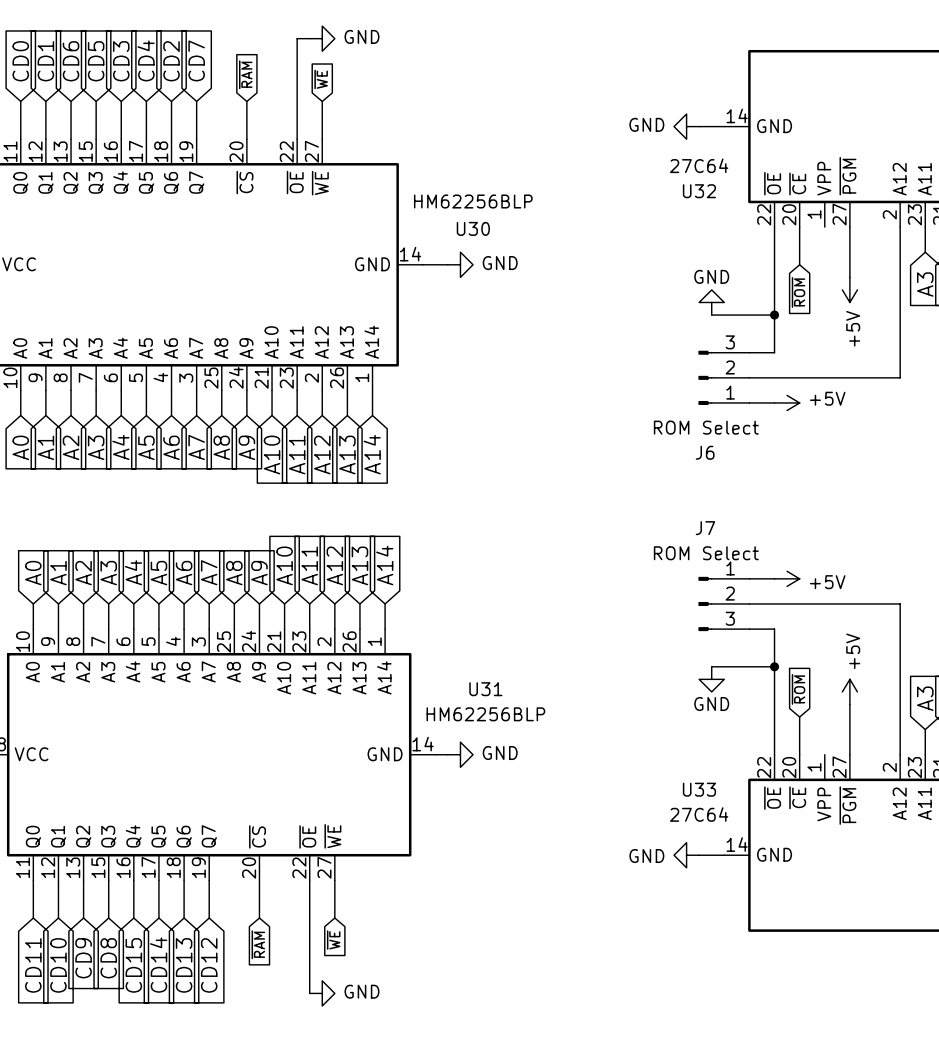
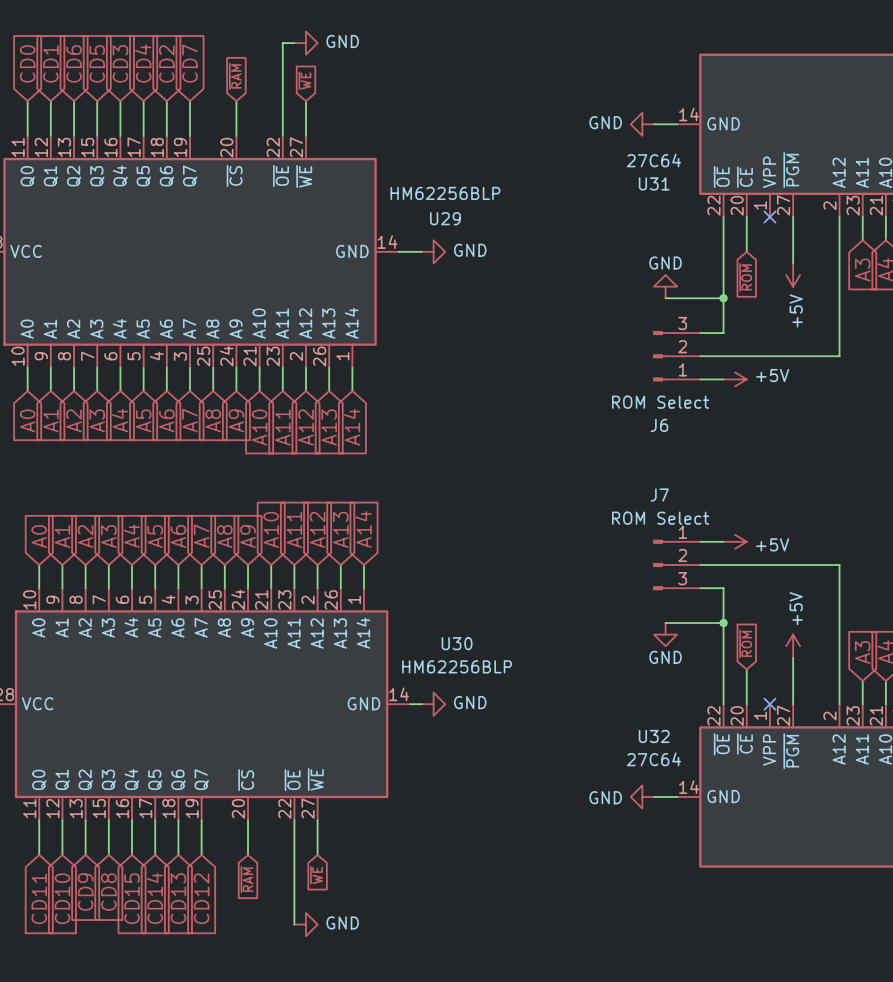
U32 name: U32 (699, 191) -> U31 (654, 183)
no-connect mark: none -> (769, 217)
U30 name: U30 (473, 228) -> U29 (445, 218)
U31 name: U31 (485, 689) -> U30 (457, 643)
no-connect mark: none -> (769, 704)
U33 name: U33 (699, 789) -> U32 (654, 736)

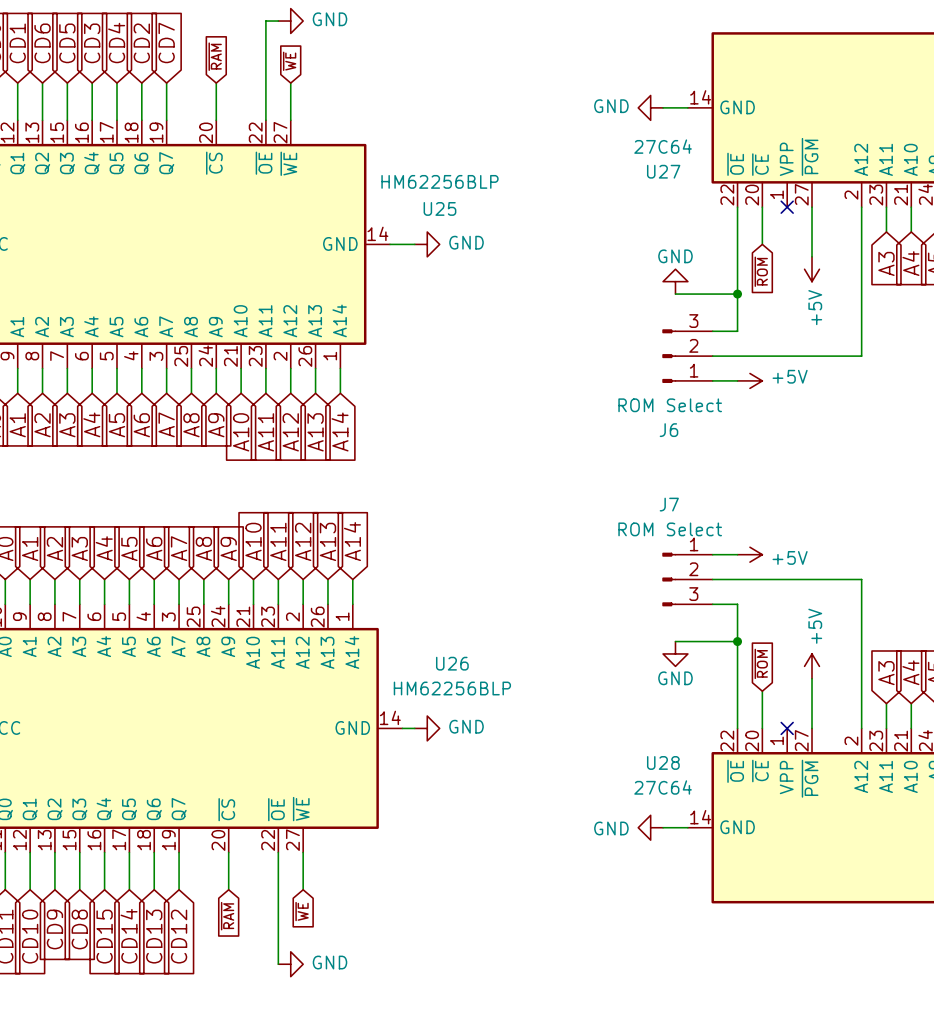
U31 name: U31 (654, 183) -> U27 (663, 171)
U29 name: U29 (445, 218) -> U25 (439, 208)
U30 name: U30 (457, 643) -> U26 (452, 663)
U32 name: U32 (654, 736) -> U28 (663, 762)

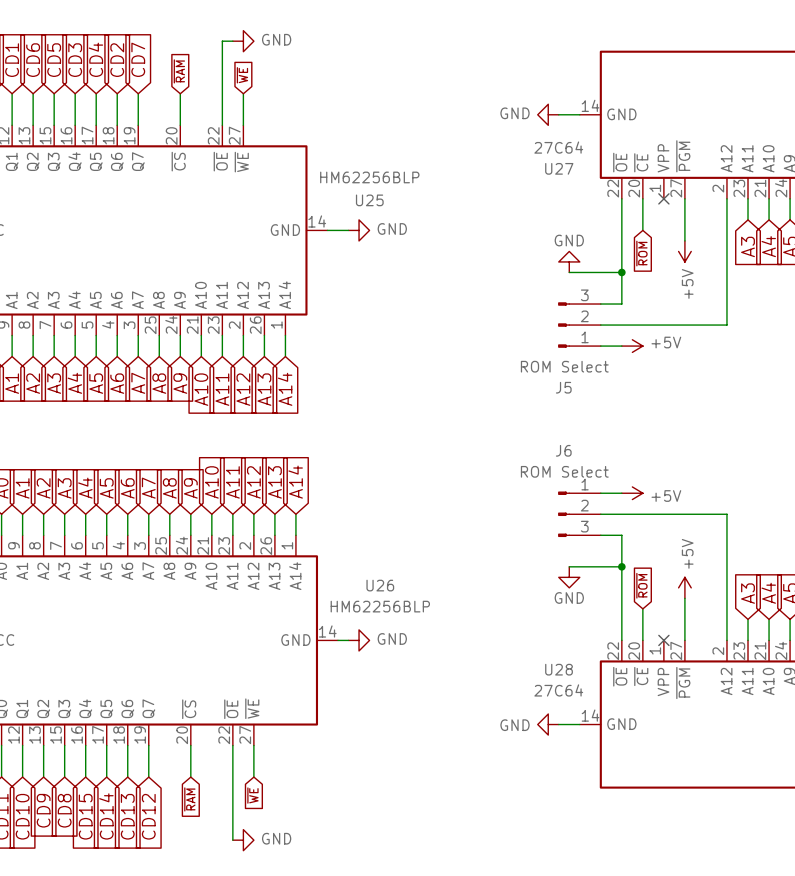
J6 name: J6 (668, 430) -> J5 (563, 387)
J7 name: J7 (669, 504) -> J6 (563, 450)

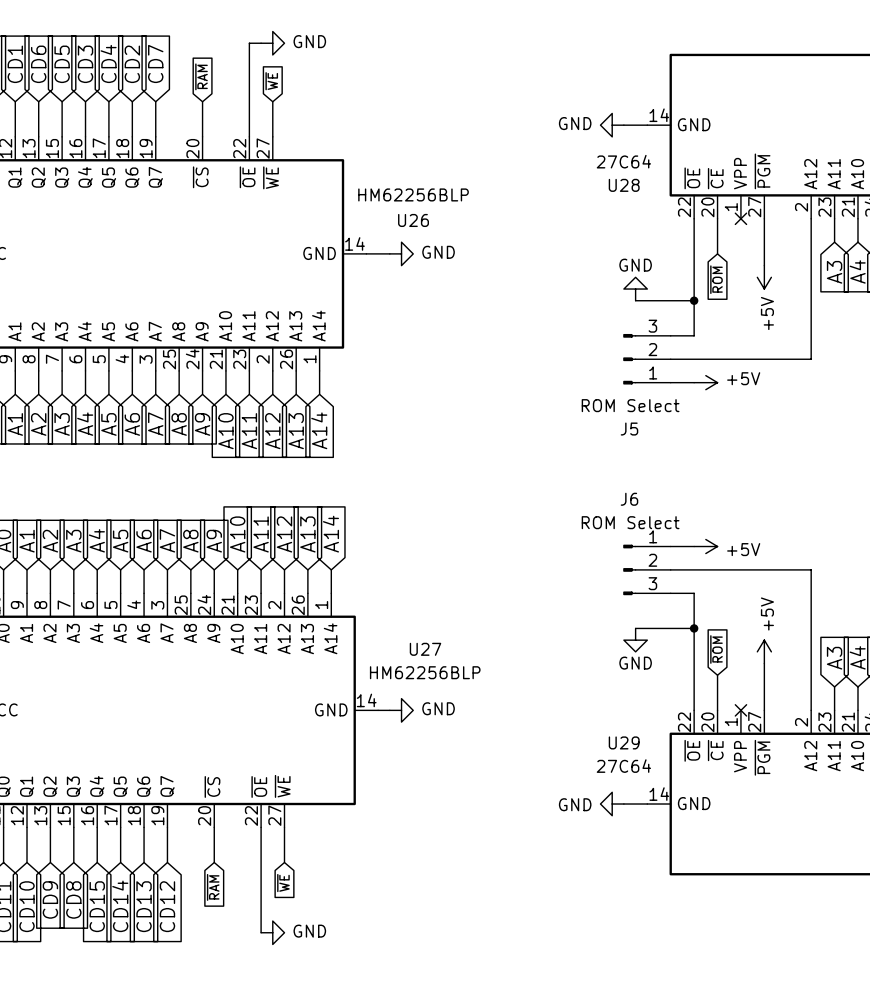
U27 name: U27 (559, 168) -> U28 (624, 185)
U25 name: U25 (369, 200) -> U26 (413, 220)
U26 name: U26 (380, 585) -> U27 (425, 649)
U28 name: U28 (559, 669) -> U29 (624, 742)

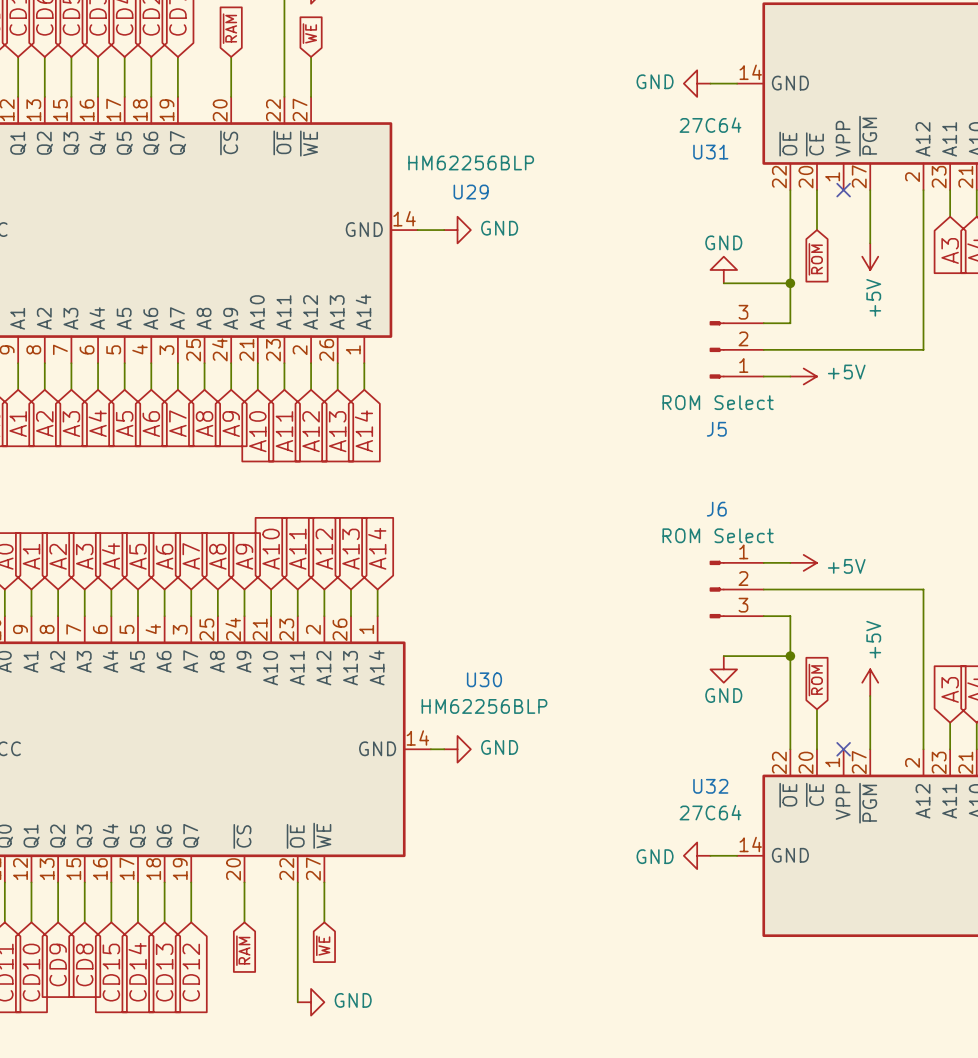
U28 name: U28 (624, 185) -> U31 (710, 152)
U26 name: U26 (413, 220) -> U29 (471, 192)
U27 name: U27 (425, 649) -> U30 (484, 679)
U29 name: U29 (624, 742) -> U32 (710, 786)

